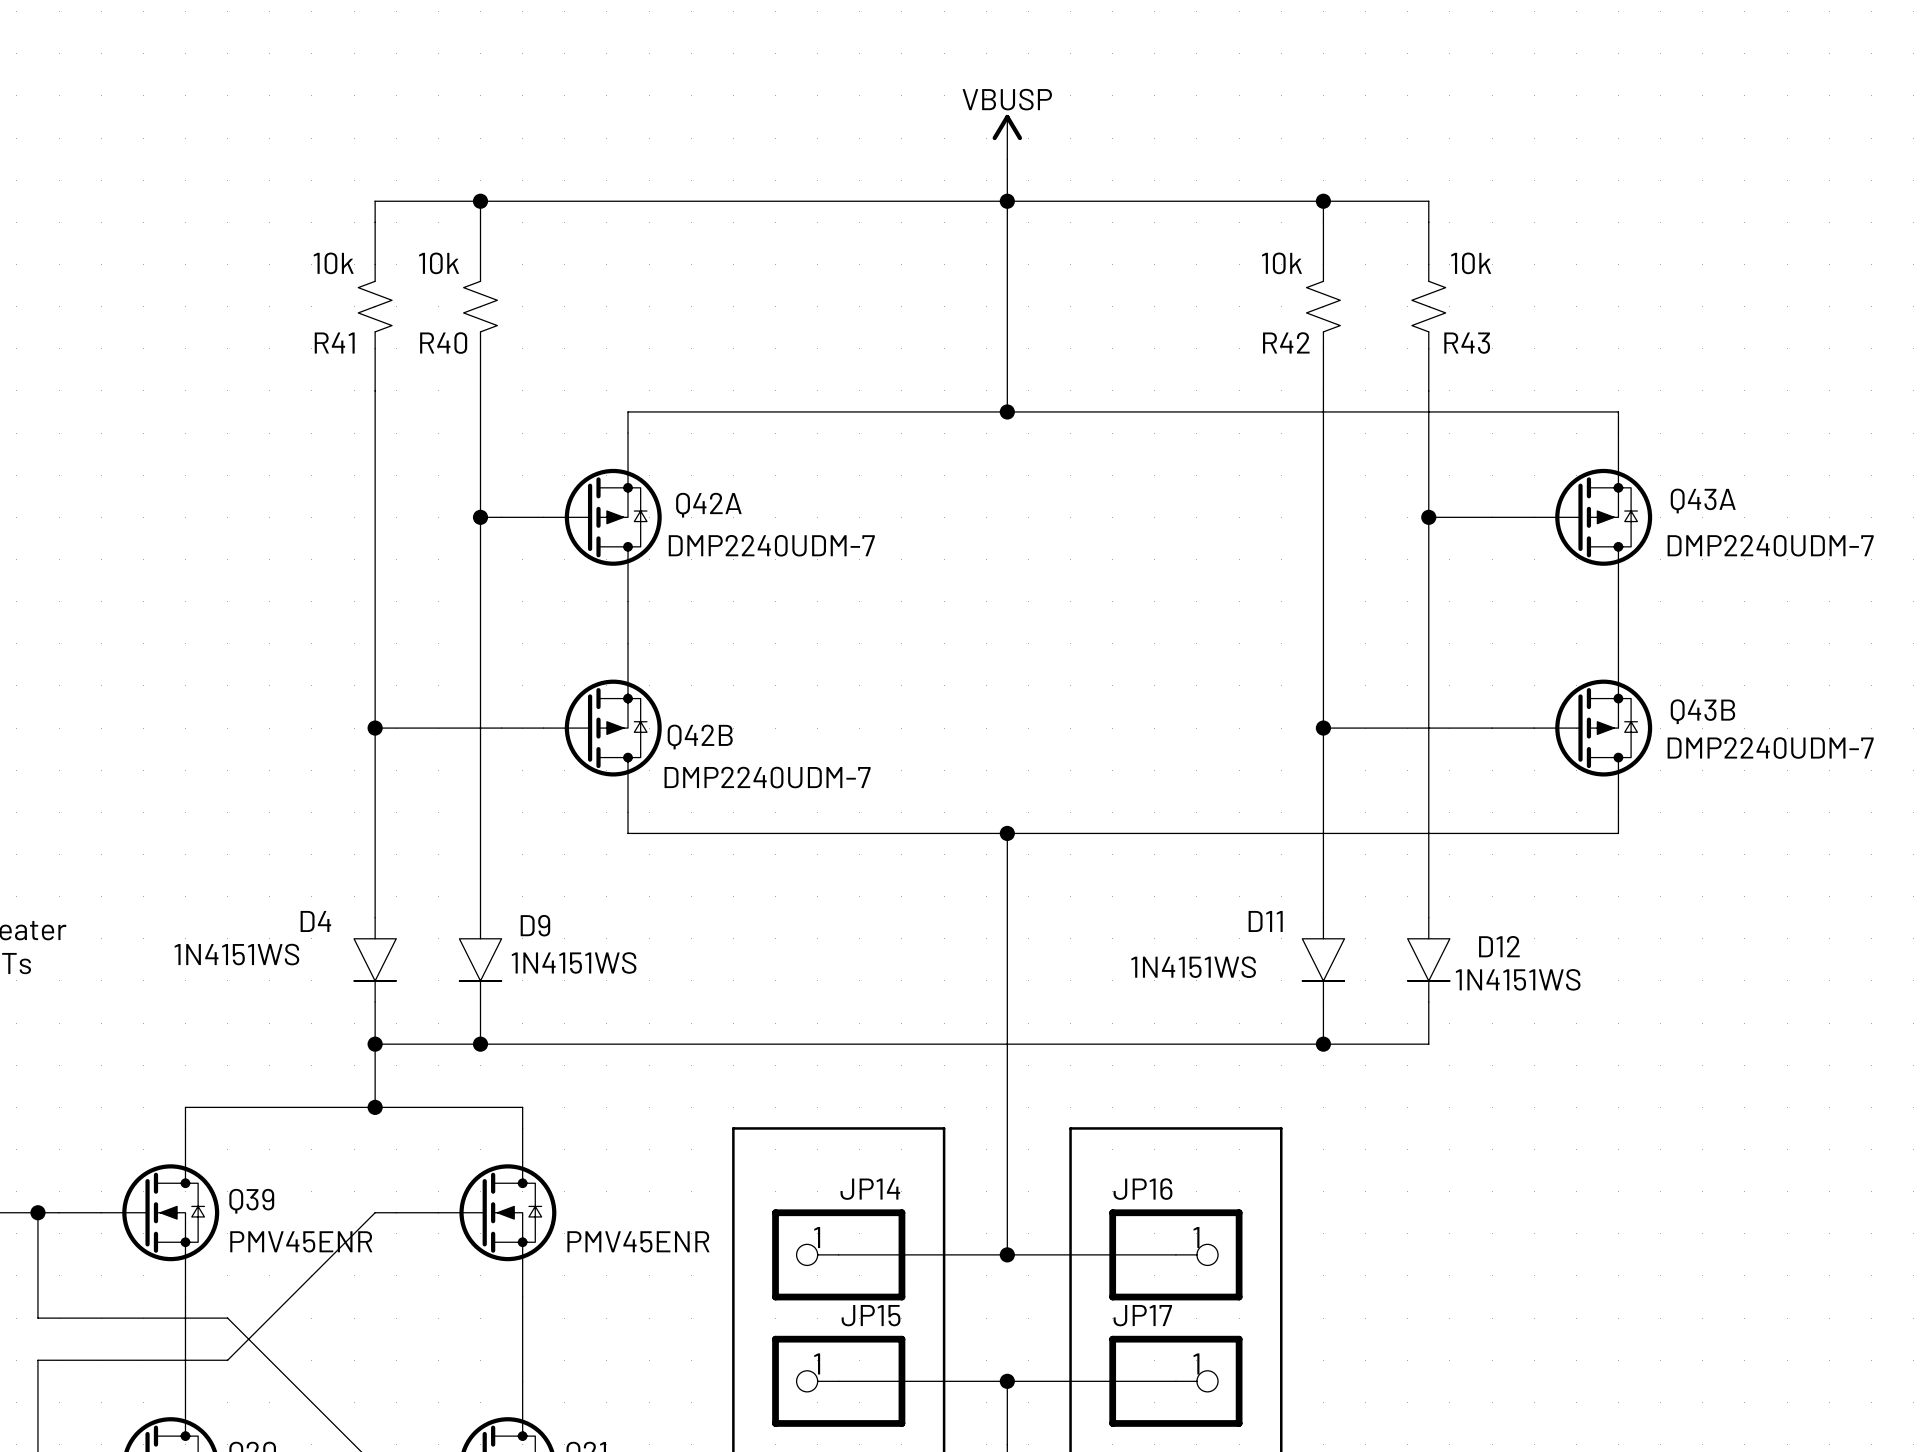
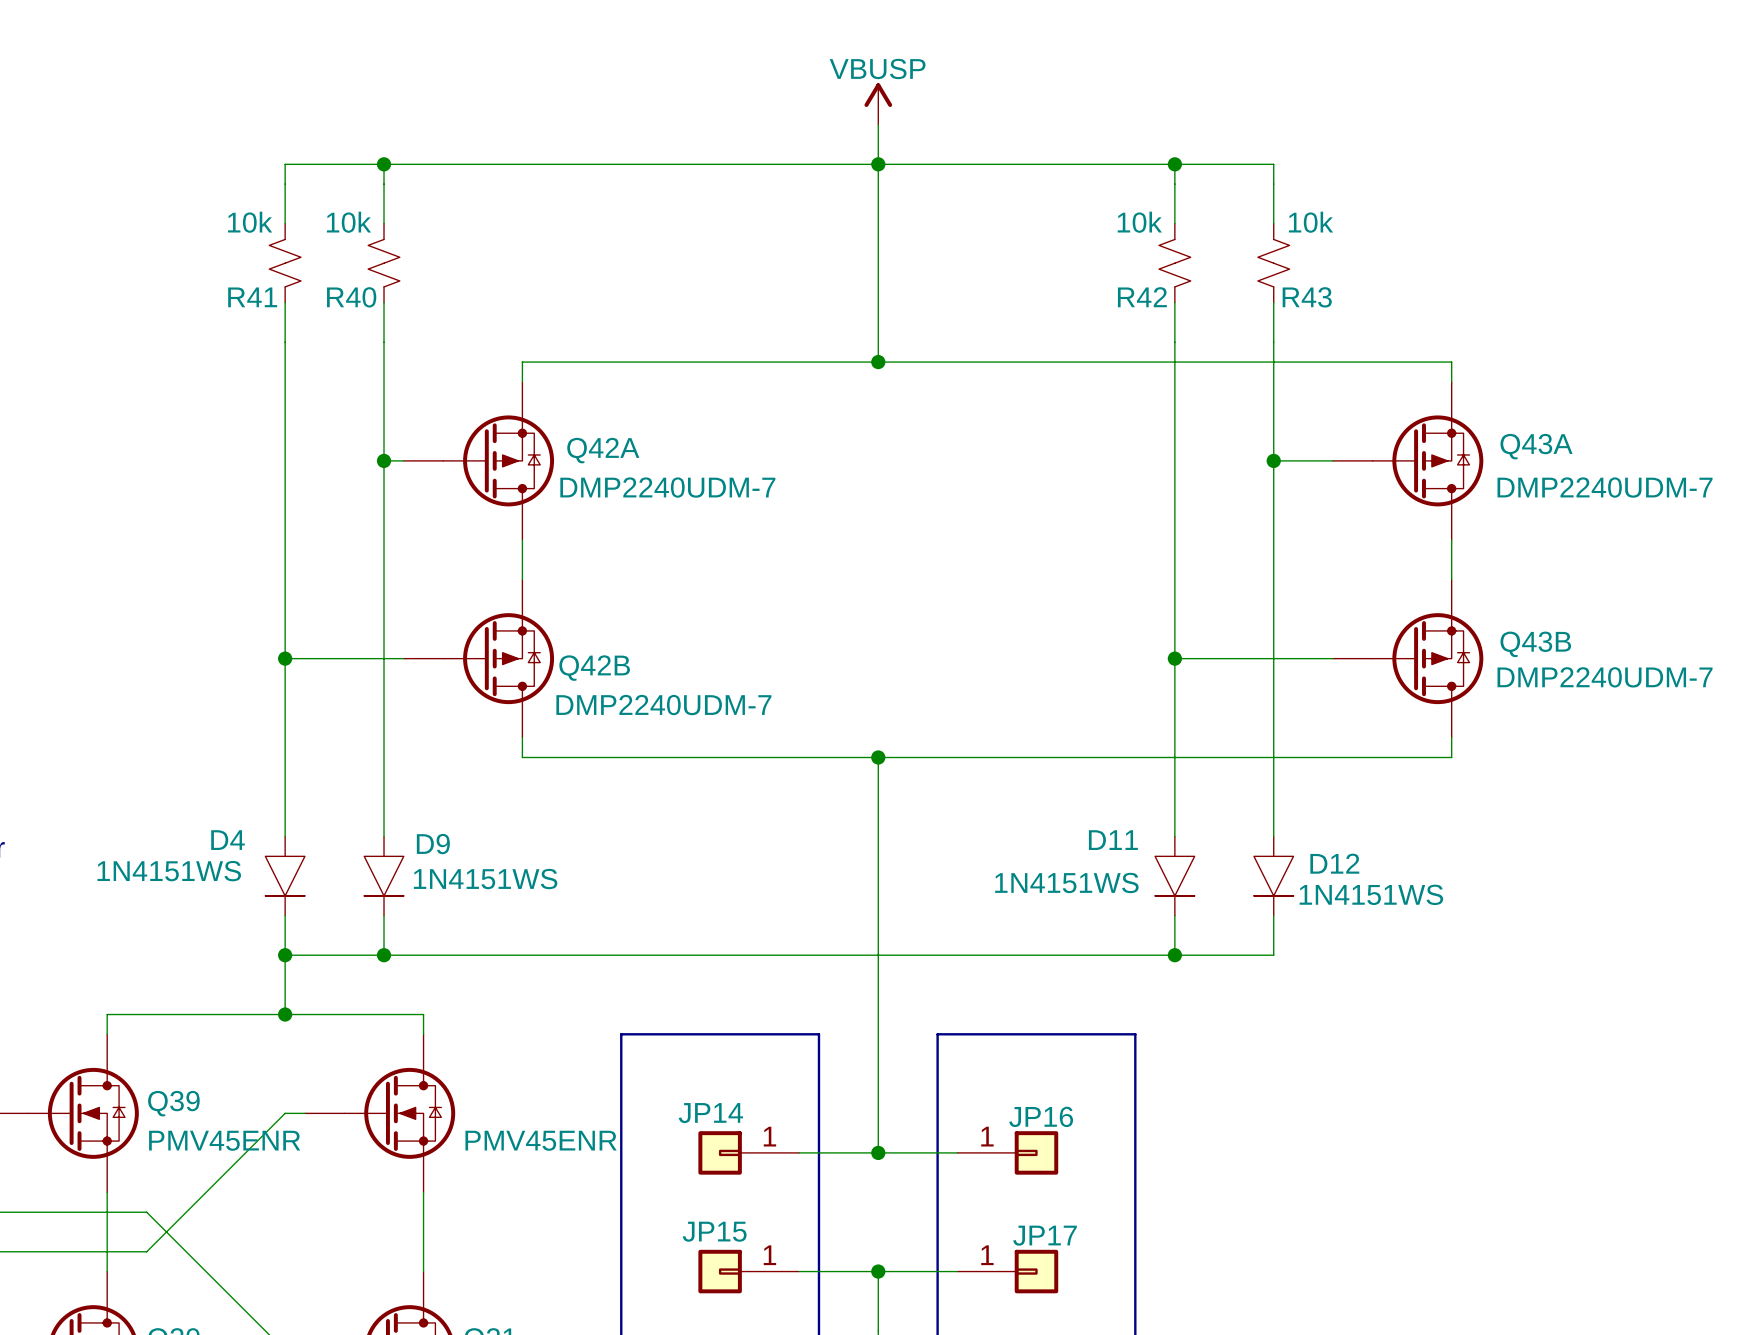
JP14 name position: JP14 (870, 1189) -> JP14 (710, 1113)
JP16 name position: JP16 (1142, 1189) -> JP16 (1041, 1116)
JP14 symbol: [772, 1209, 906, 1301] -> [698, 1131, 800, 1175]
JP16 symbol: [1109, 1209, 1243, 1301] -> [957, 1131, 1059, 1175]
JP15 name position: JP15 (871, 1315) -> JP15 (714, 1231)
JP17 name position: JP17 (1142, 1315) -> JP17 (1044, 1235)
JP15 symbol: [772, 1335, 906, 1427] -> [698, 1249, 800, 1294]
JP17 symbol: [1109, 1335, 1243, 1427] -> [957, 1249, 1059, 1294]

